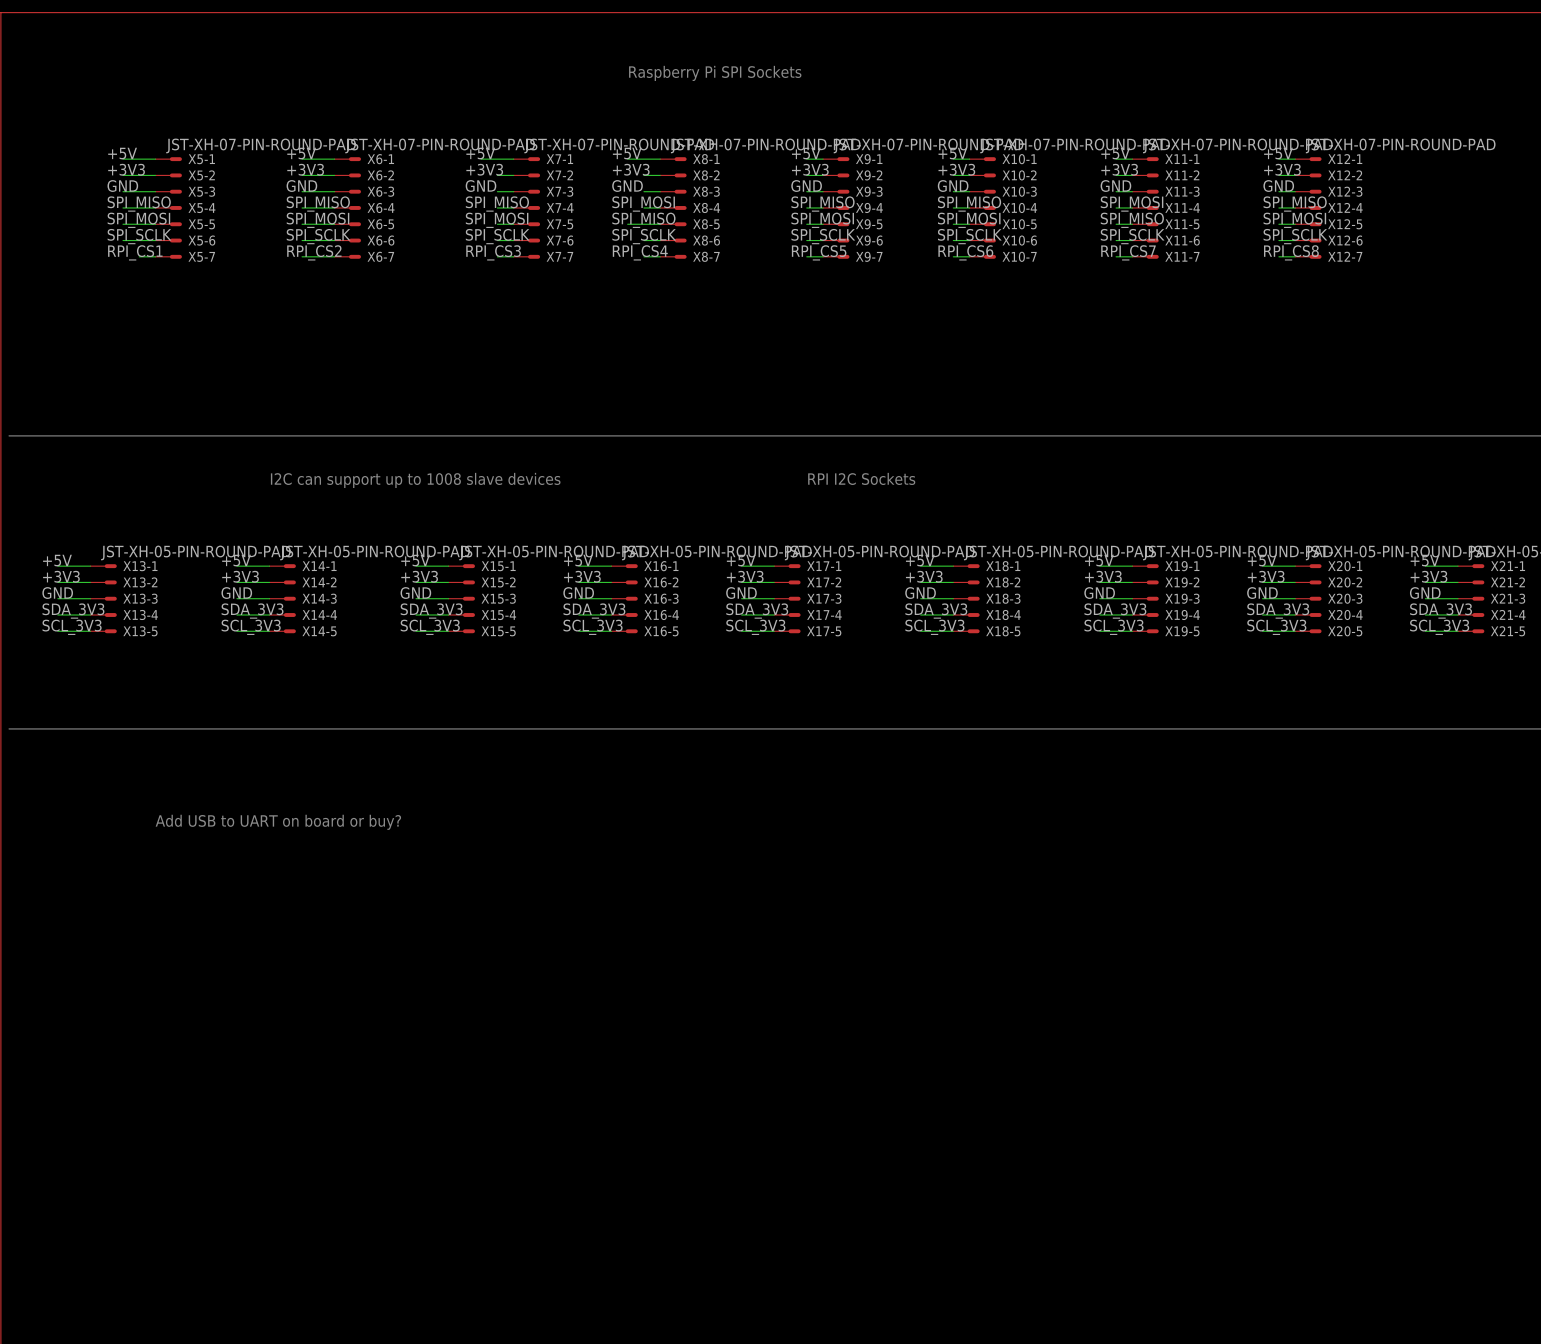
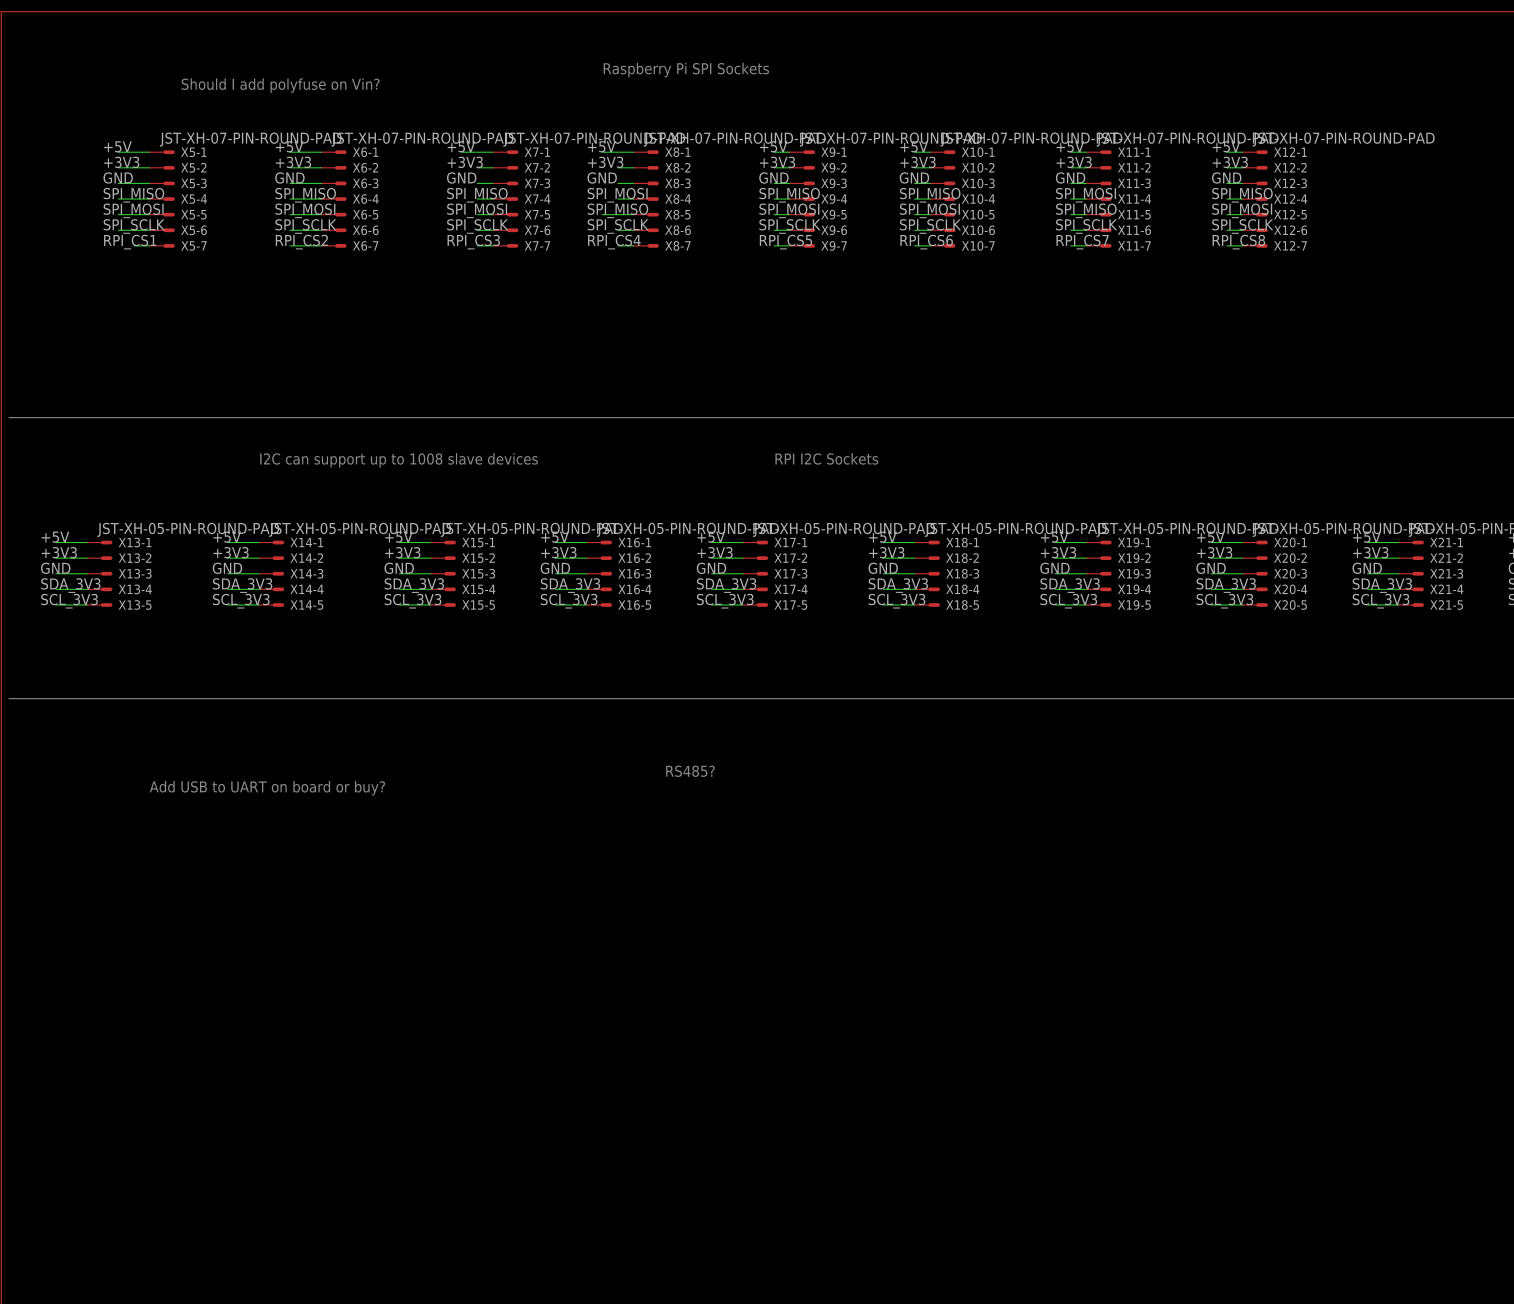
text: none -> Should I add polyfuse on Vin? (280, 85)
text: none -> RS485? (690, 771)

